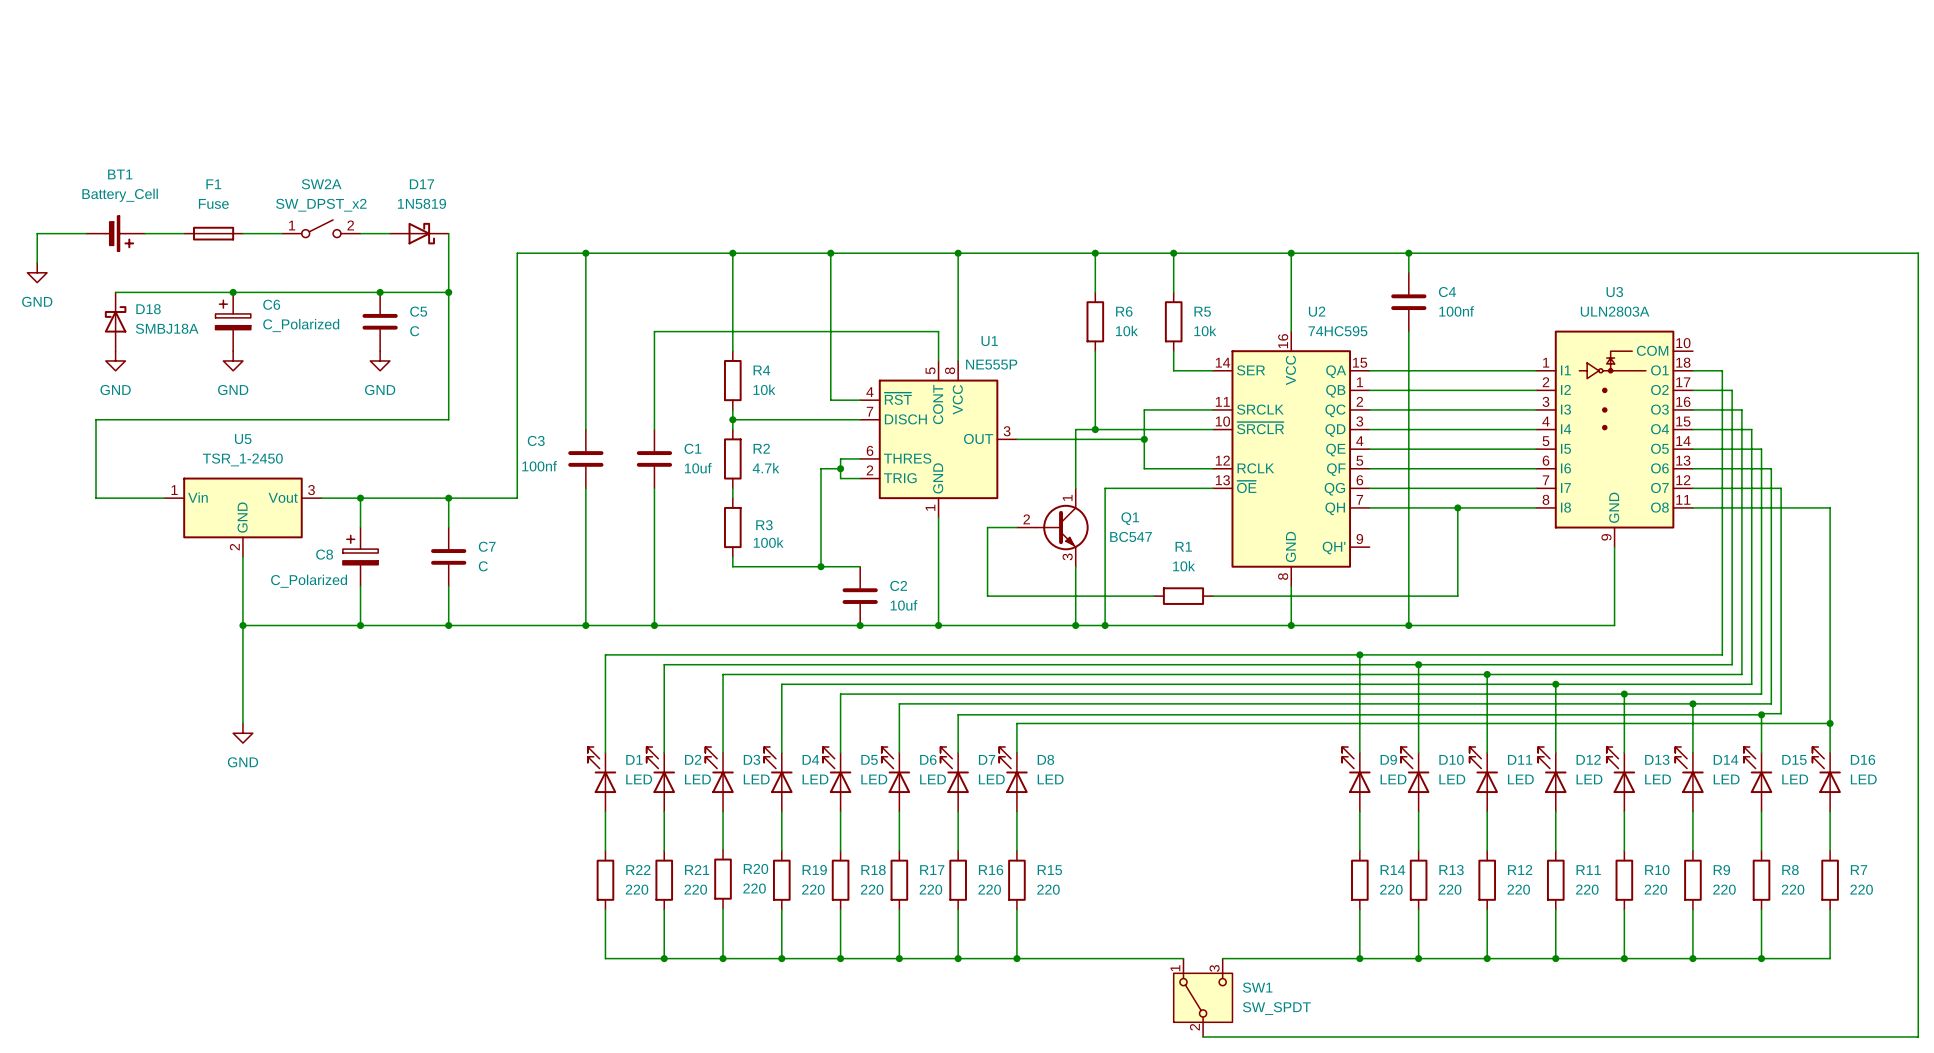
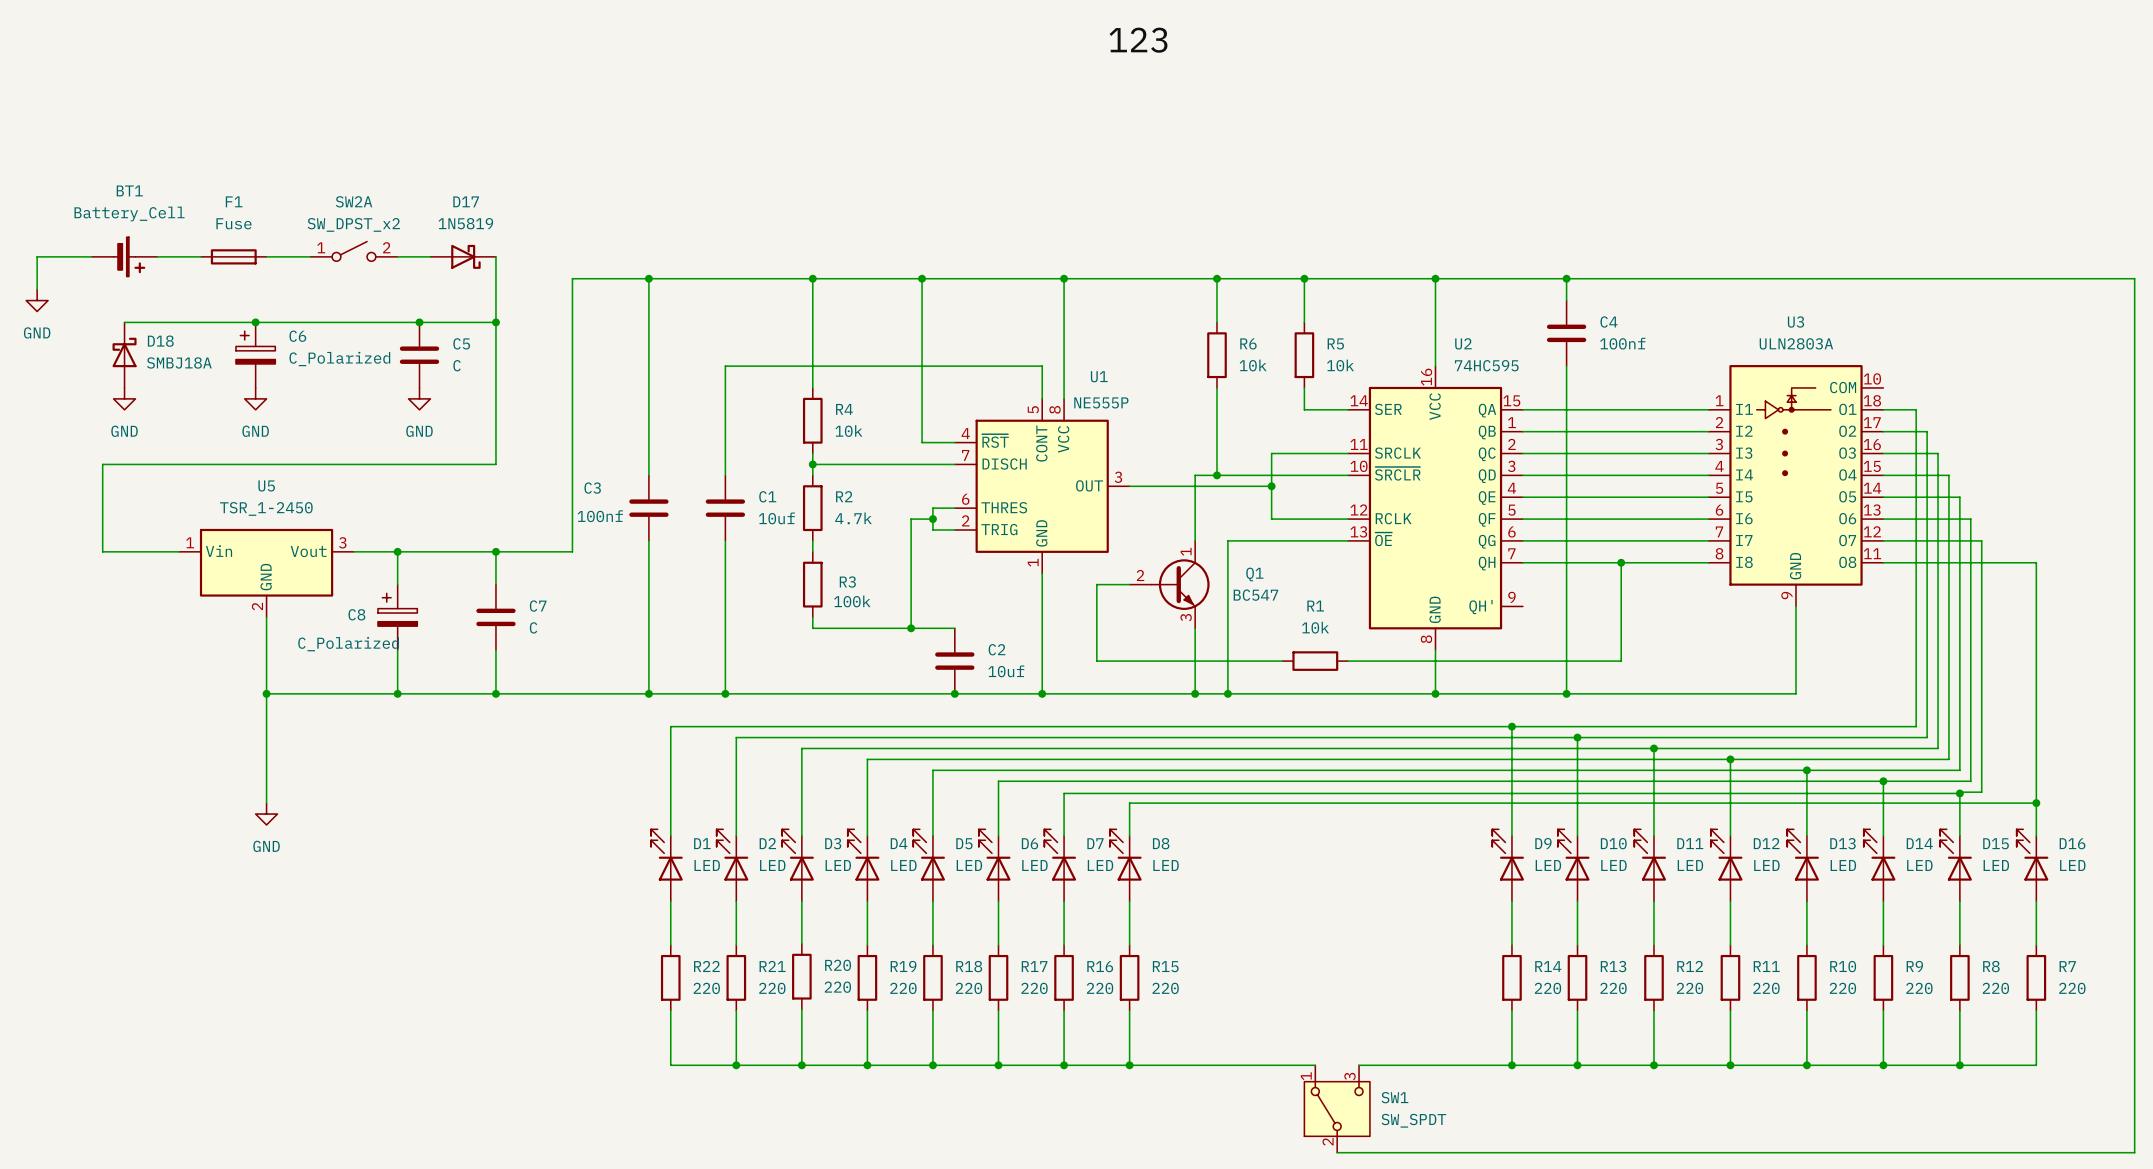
label: none -> 123 (1138, 40)

